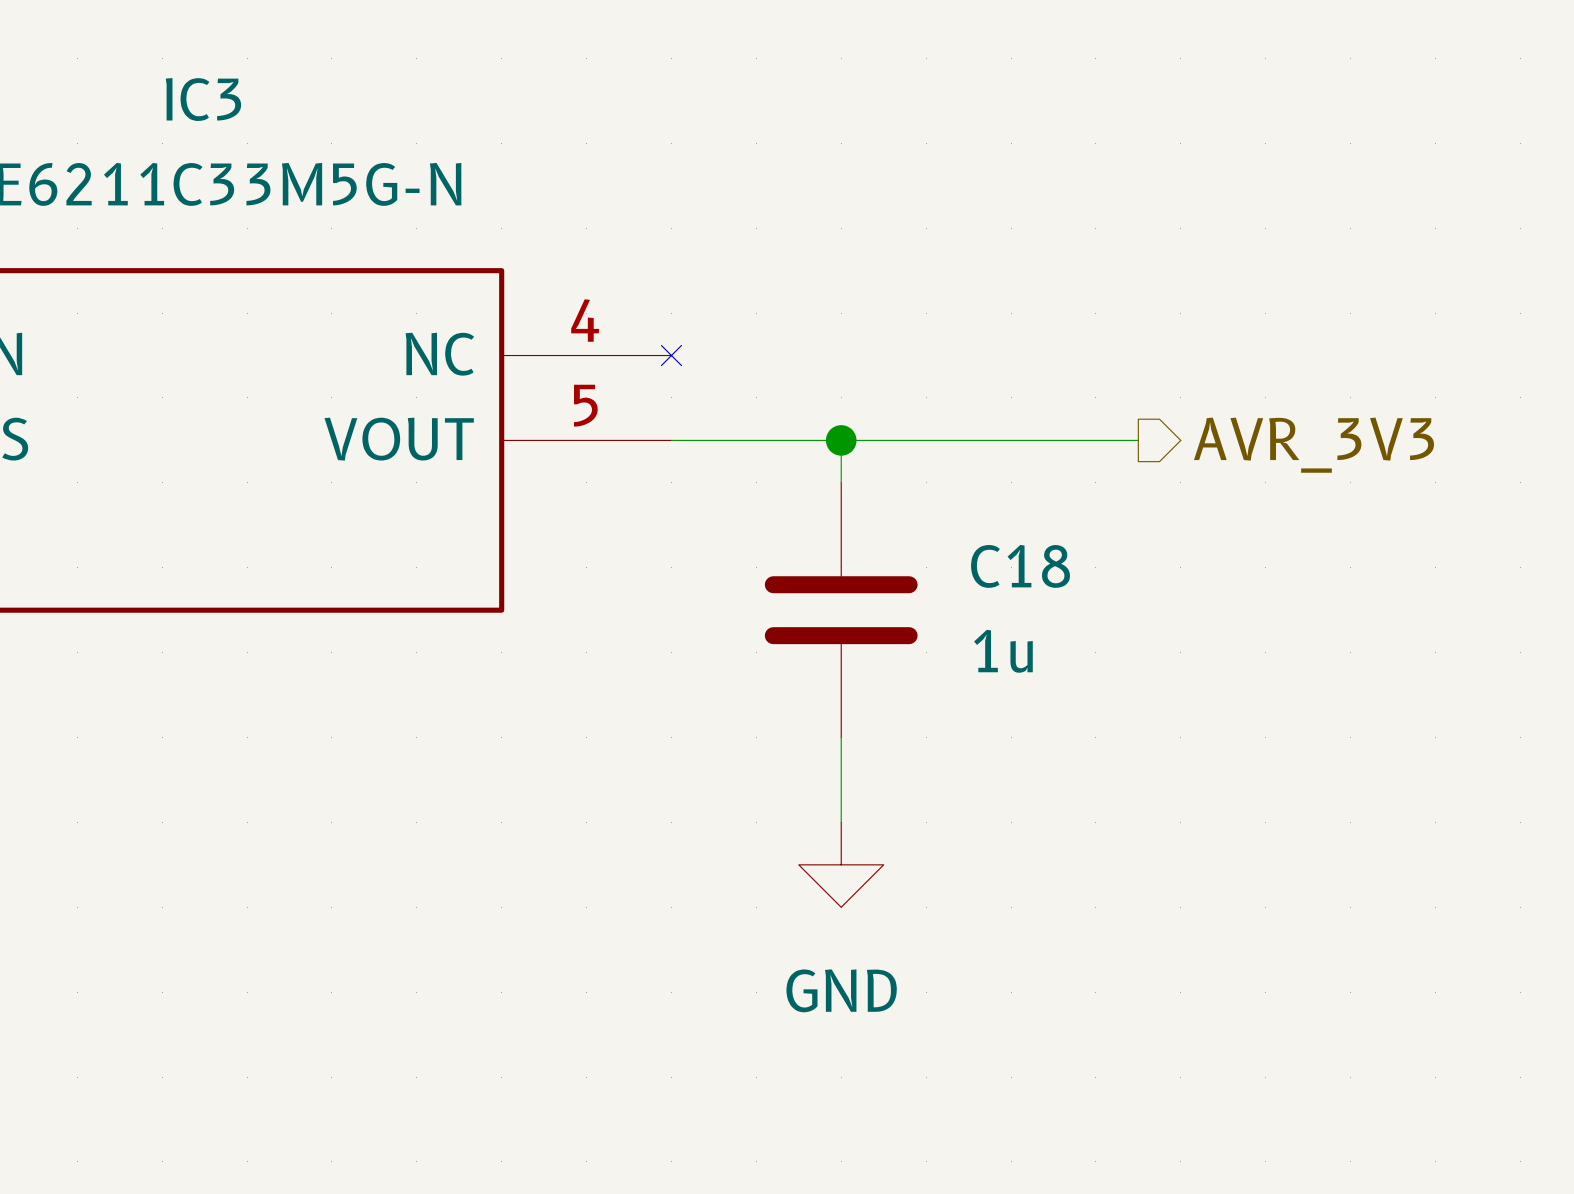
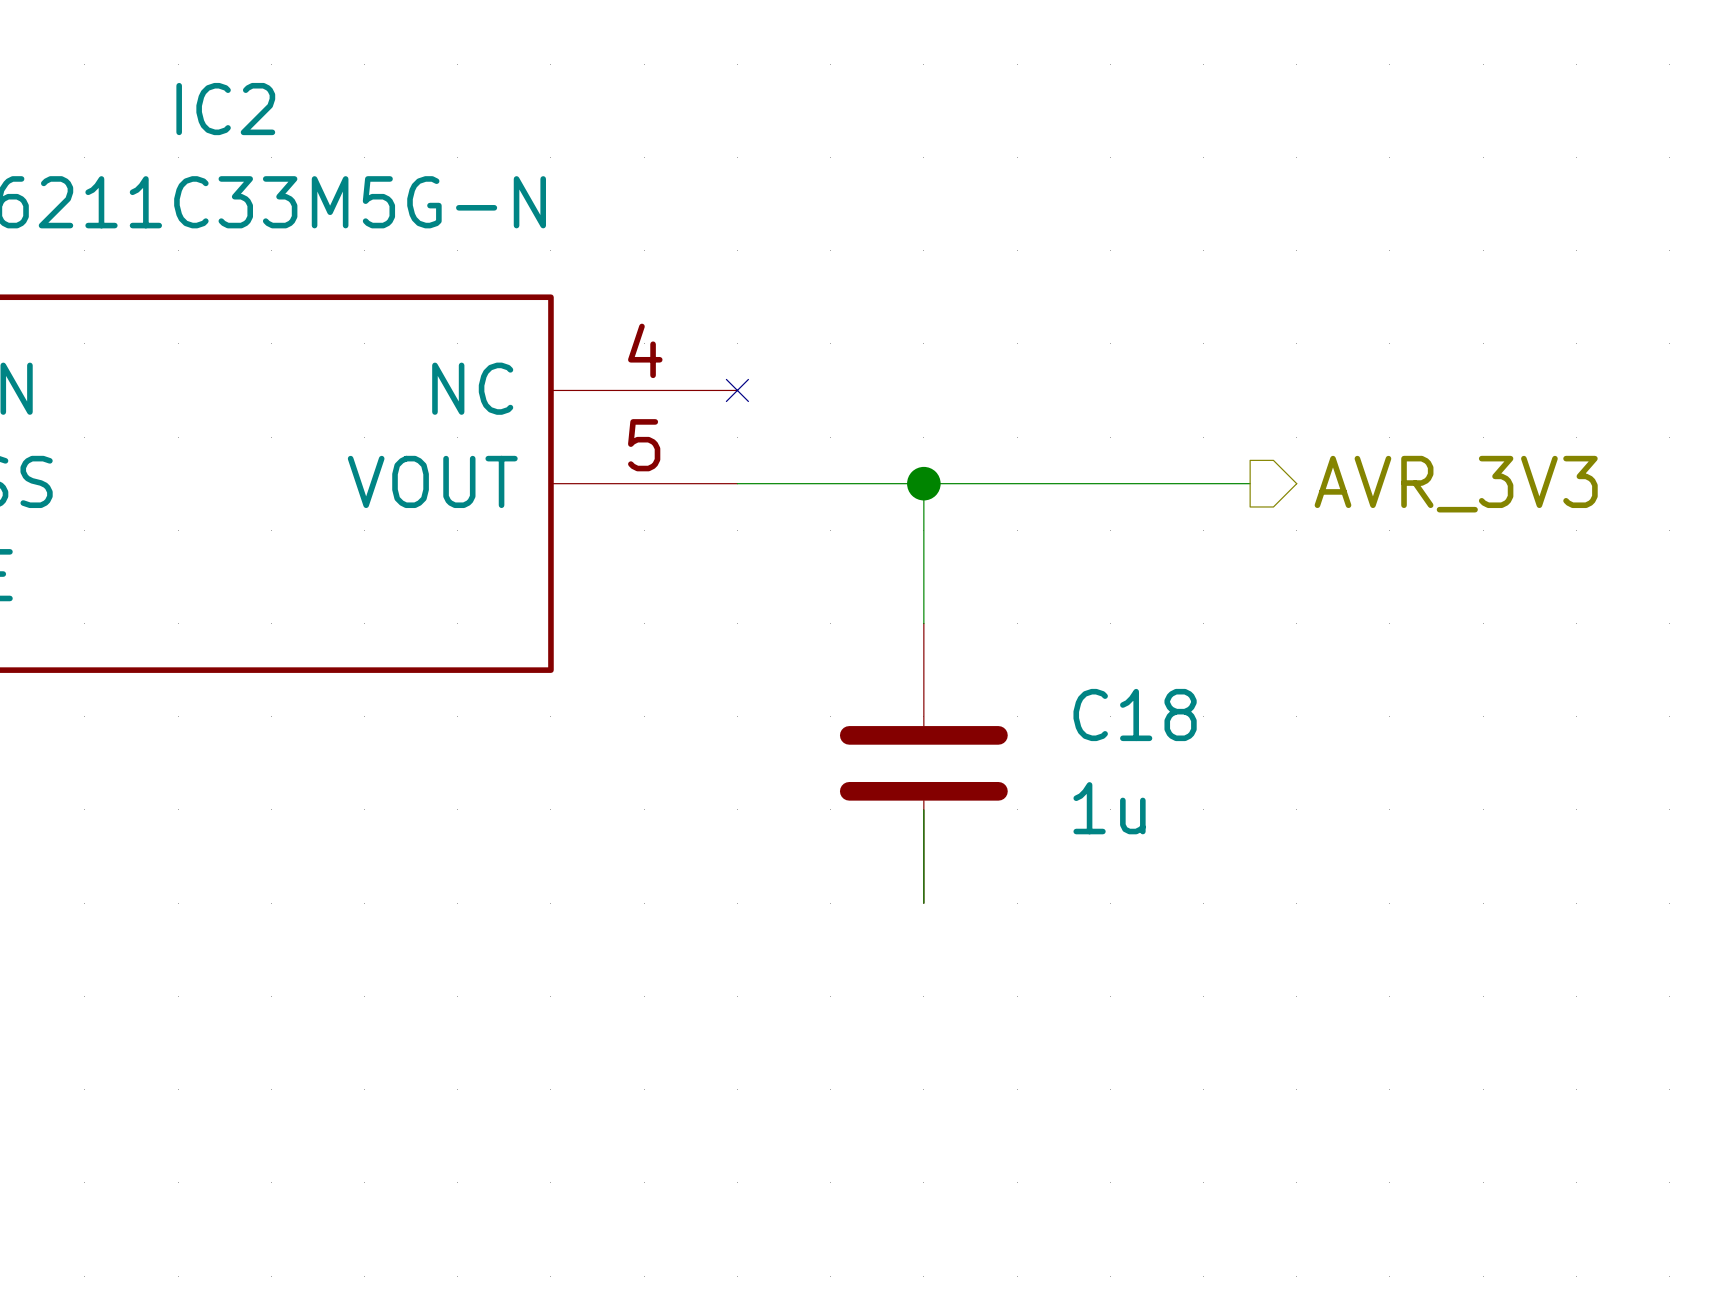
IC3 name: IC3 (203, 99) -> IC2 (225, 109)
C18 position: (841, 610) -> (923, 763)
power symbol: GND (841, 864) -> none

